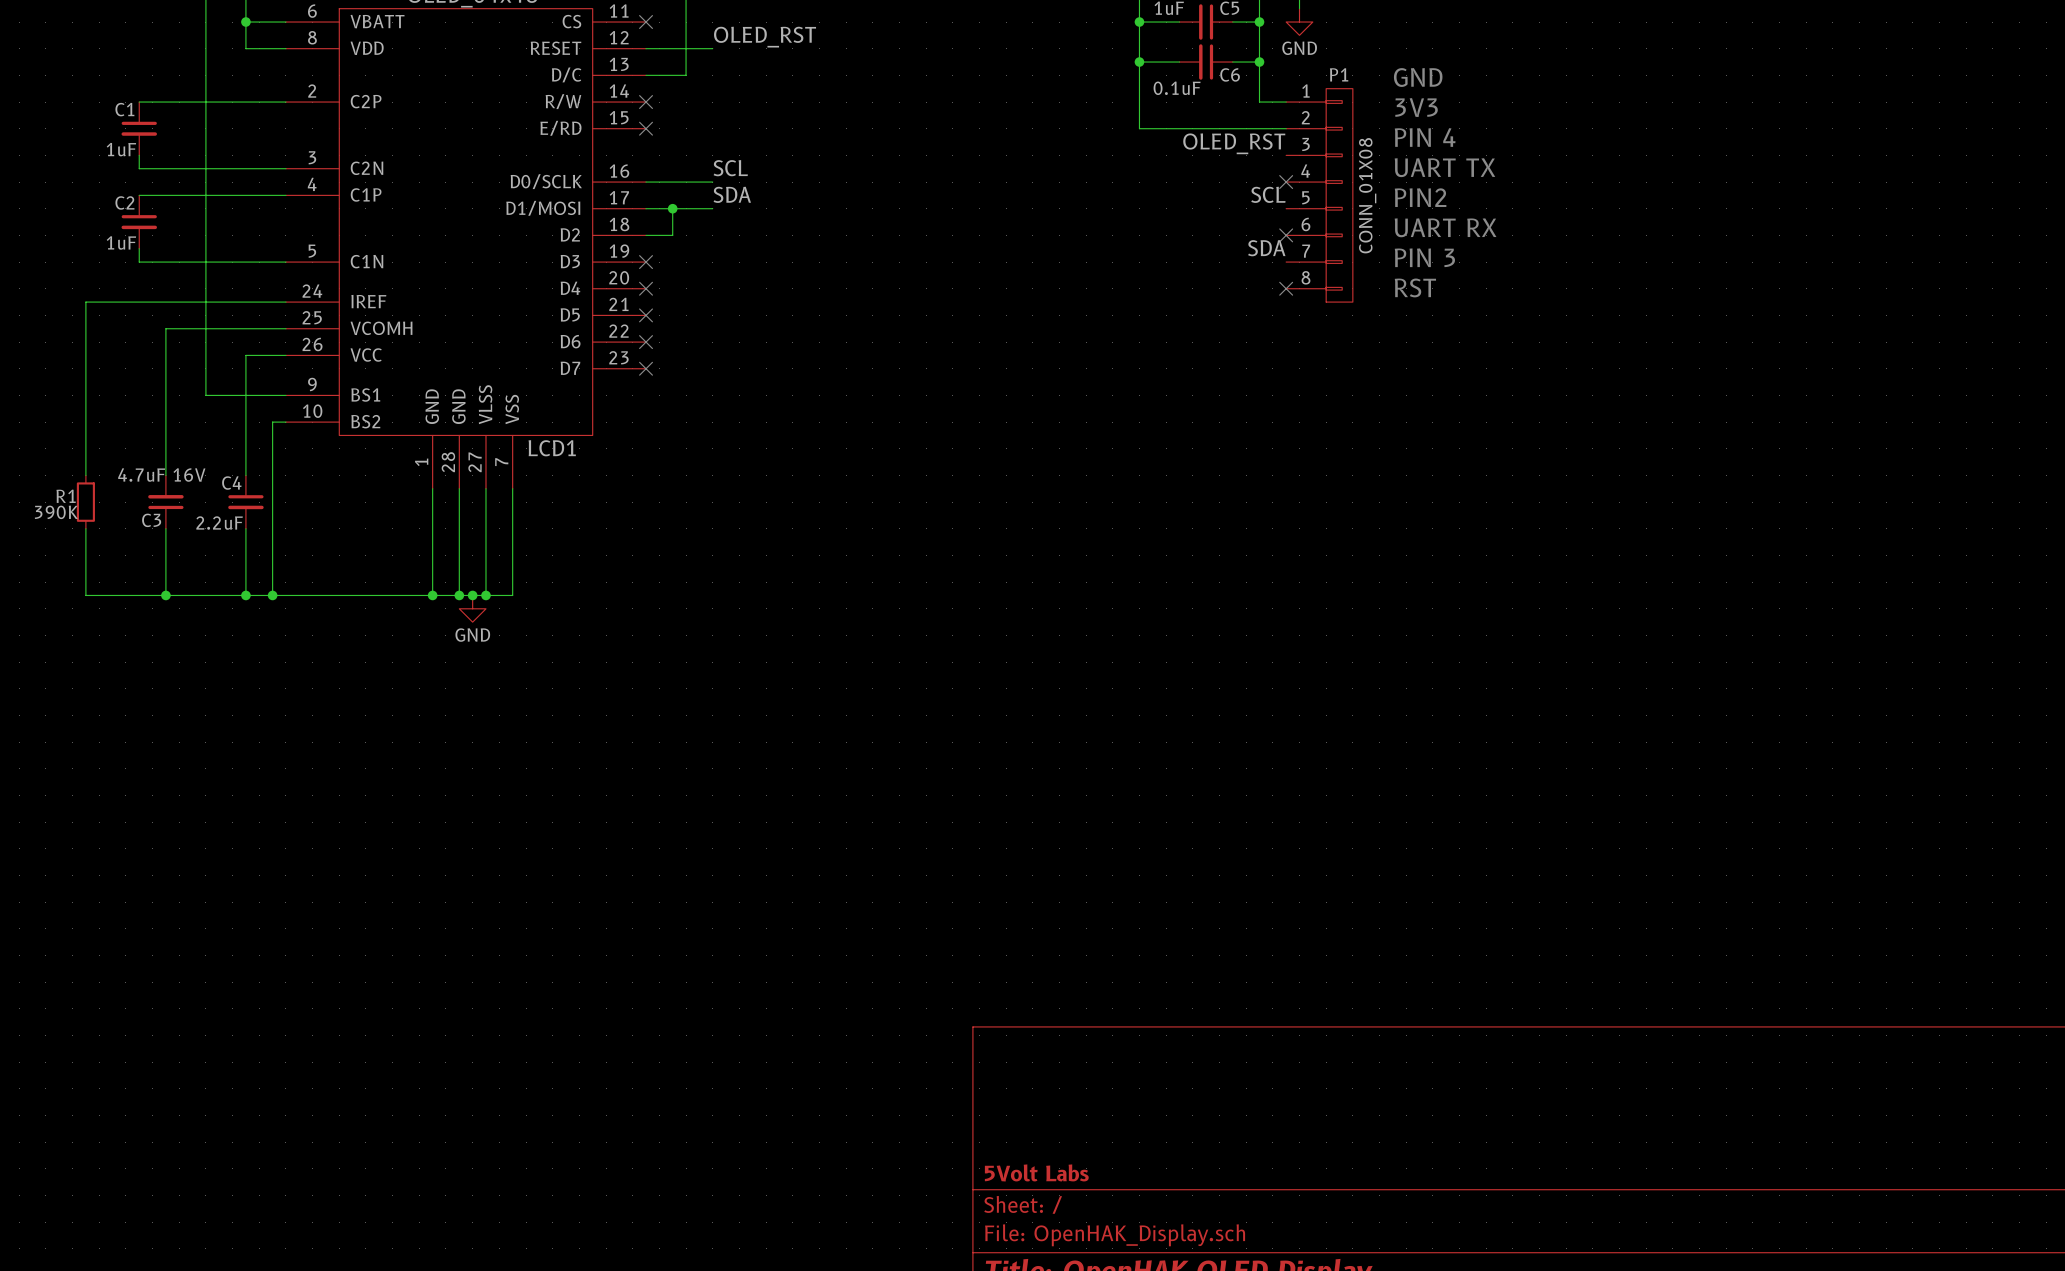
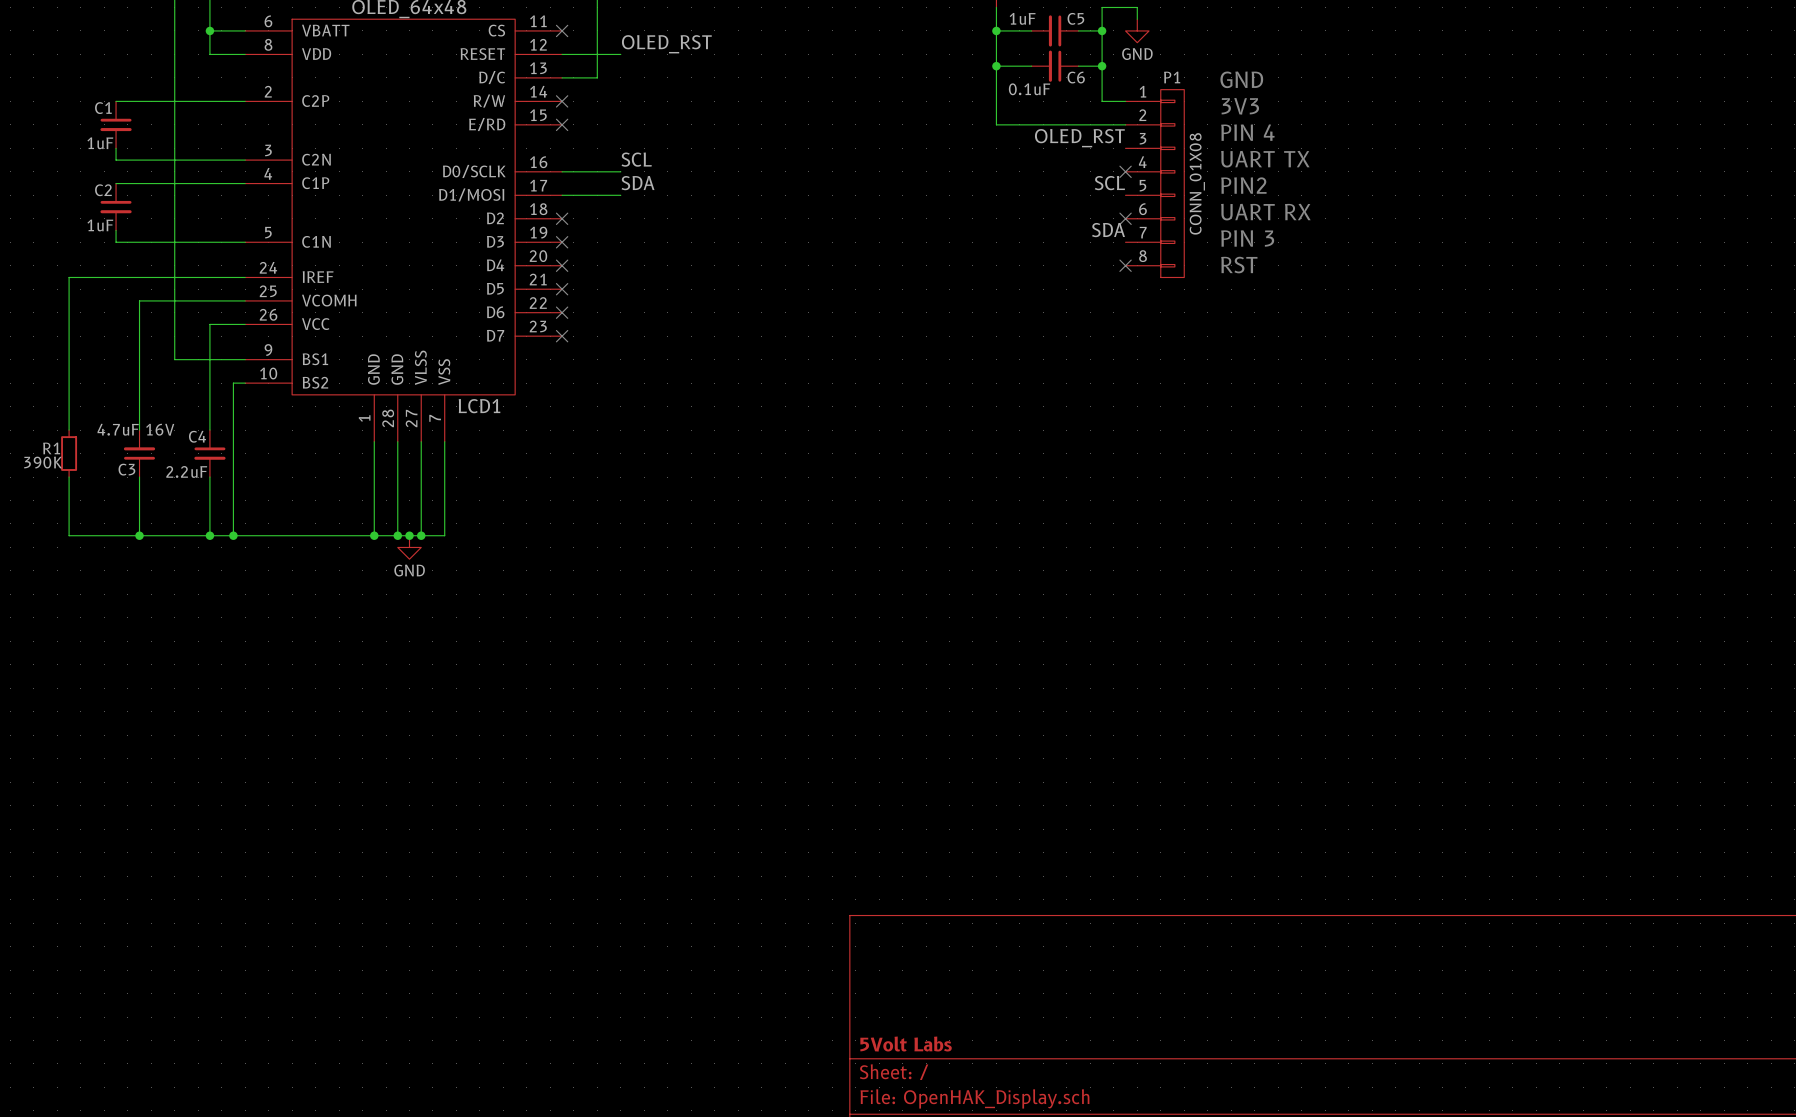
wire: (672, 208) (672, 235) (646, 235) -> none
junction: (672, 208) -> none
no-connect mark: none -> (562, 218)

